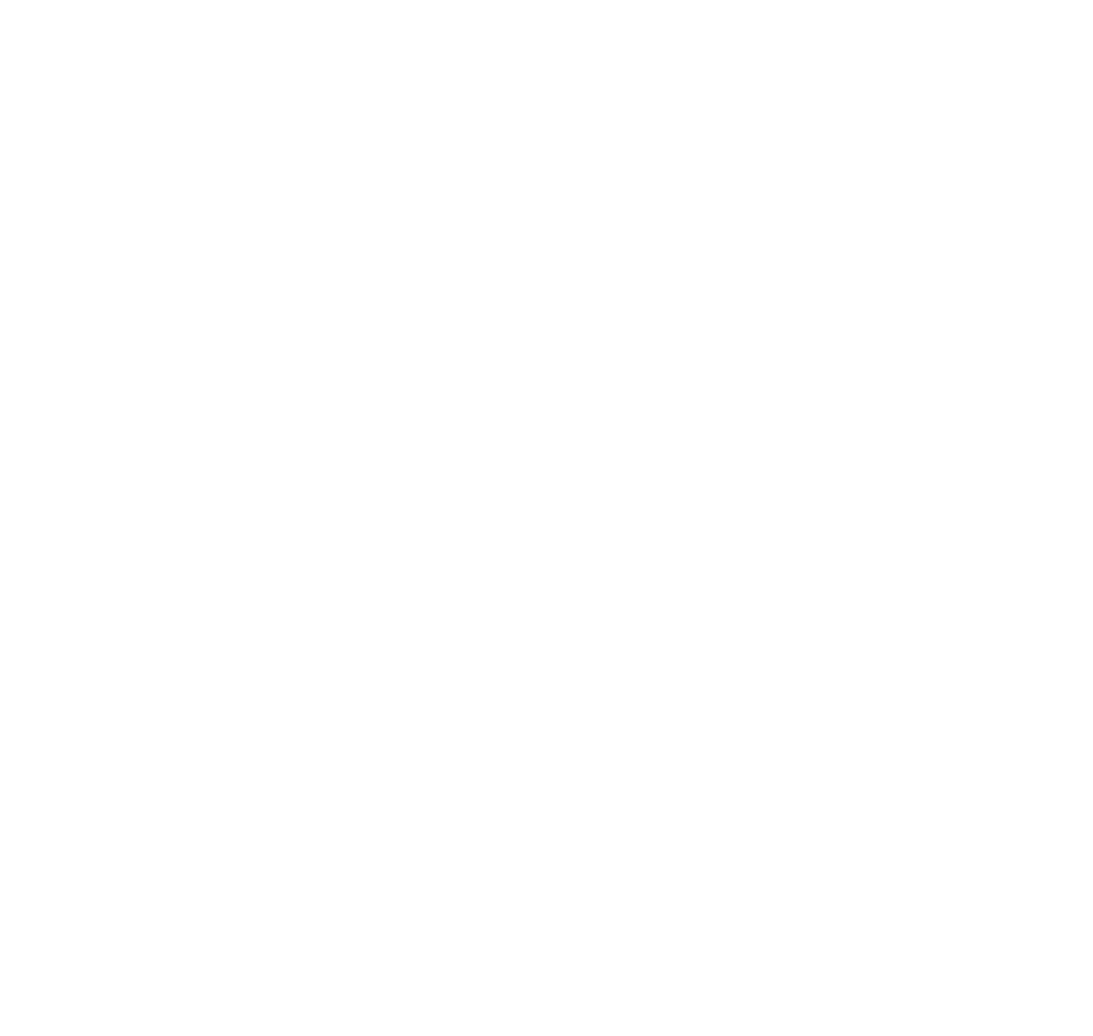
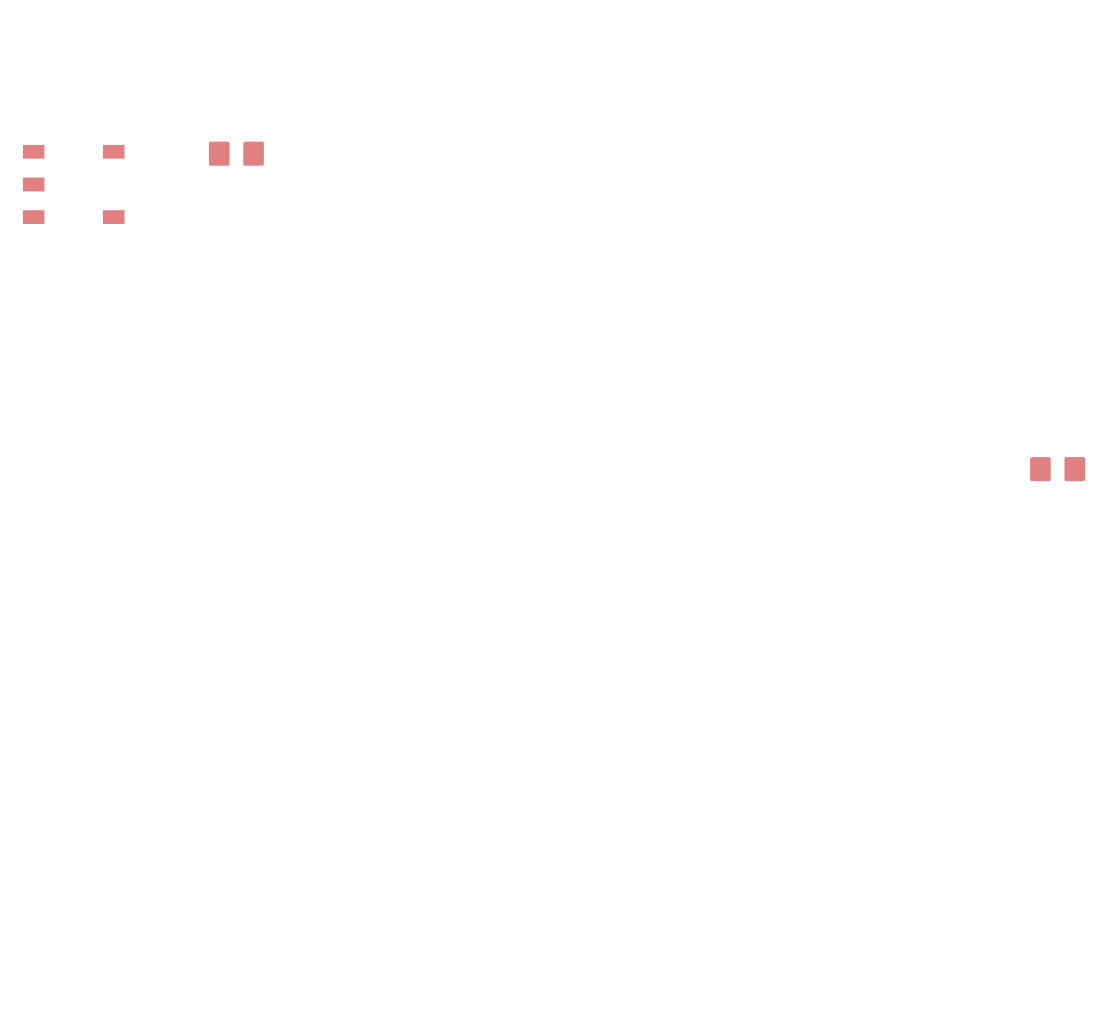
part: none -> (236, 153)
part: none -> (73, 184)
part: none -> (1057, 469)

